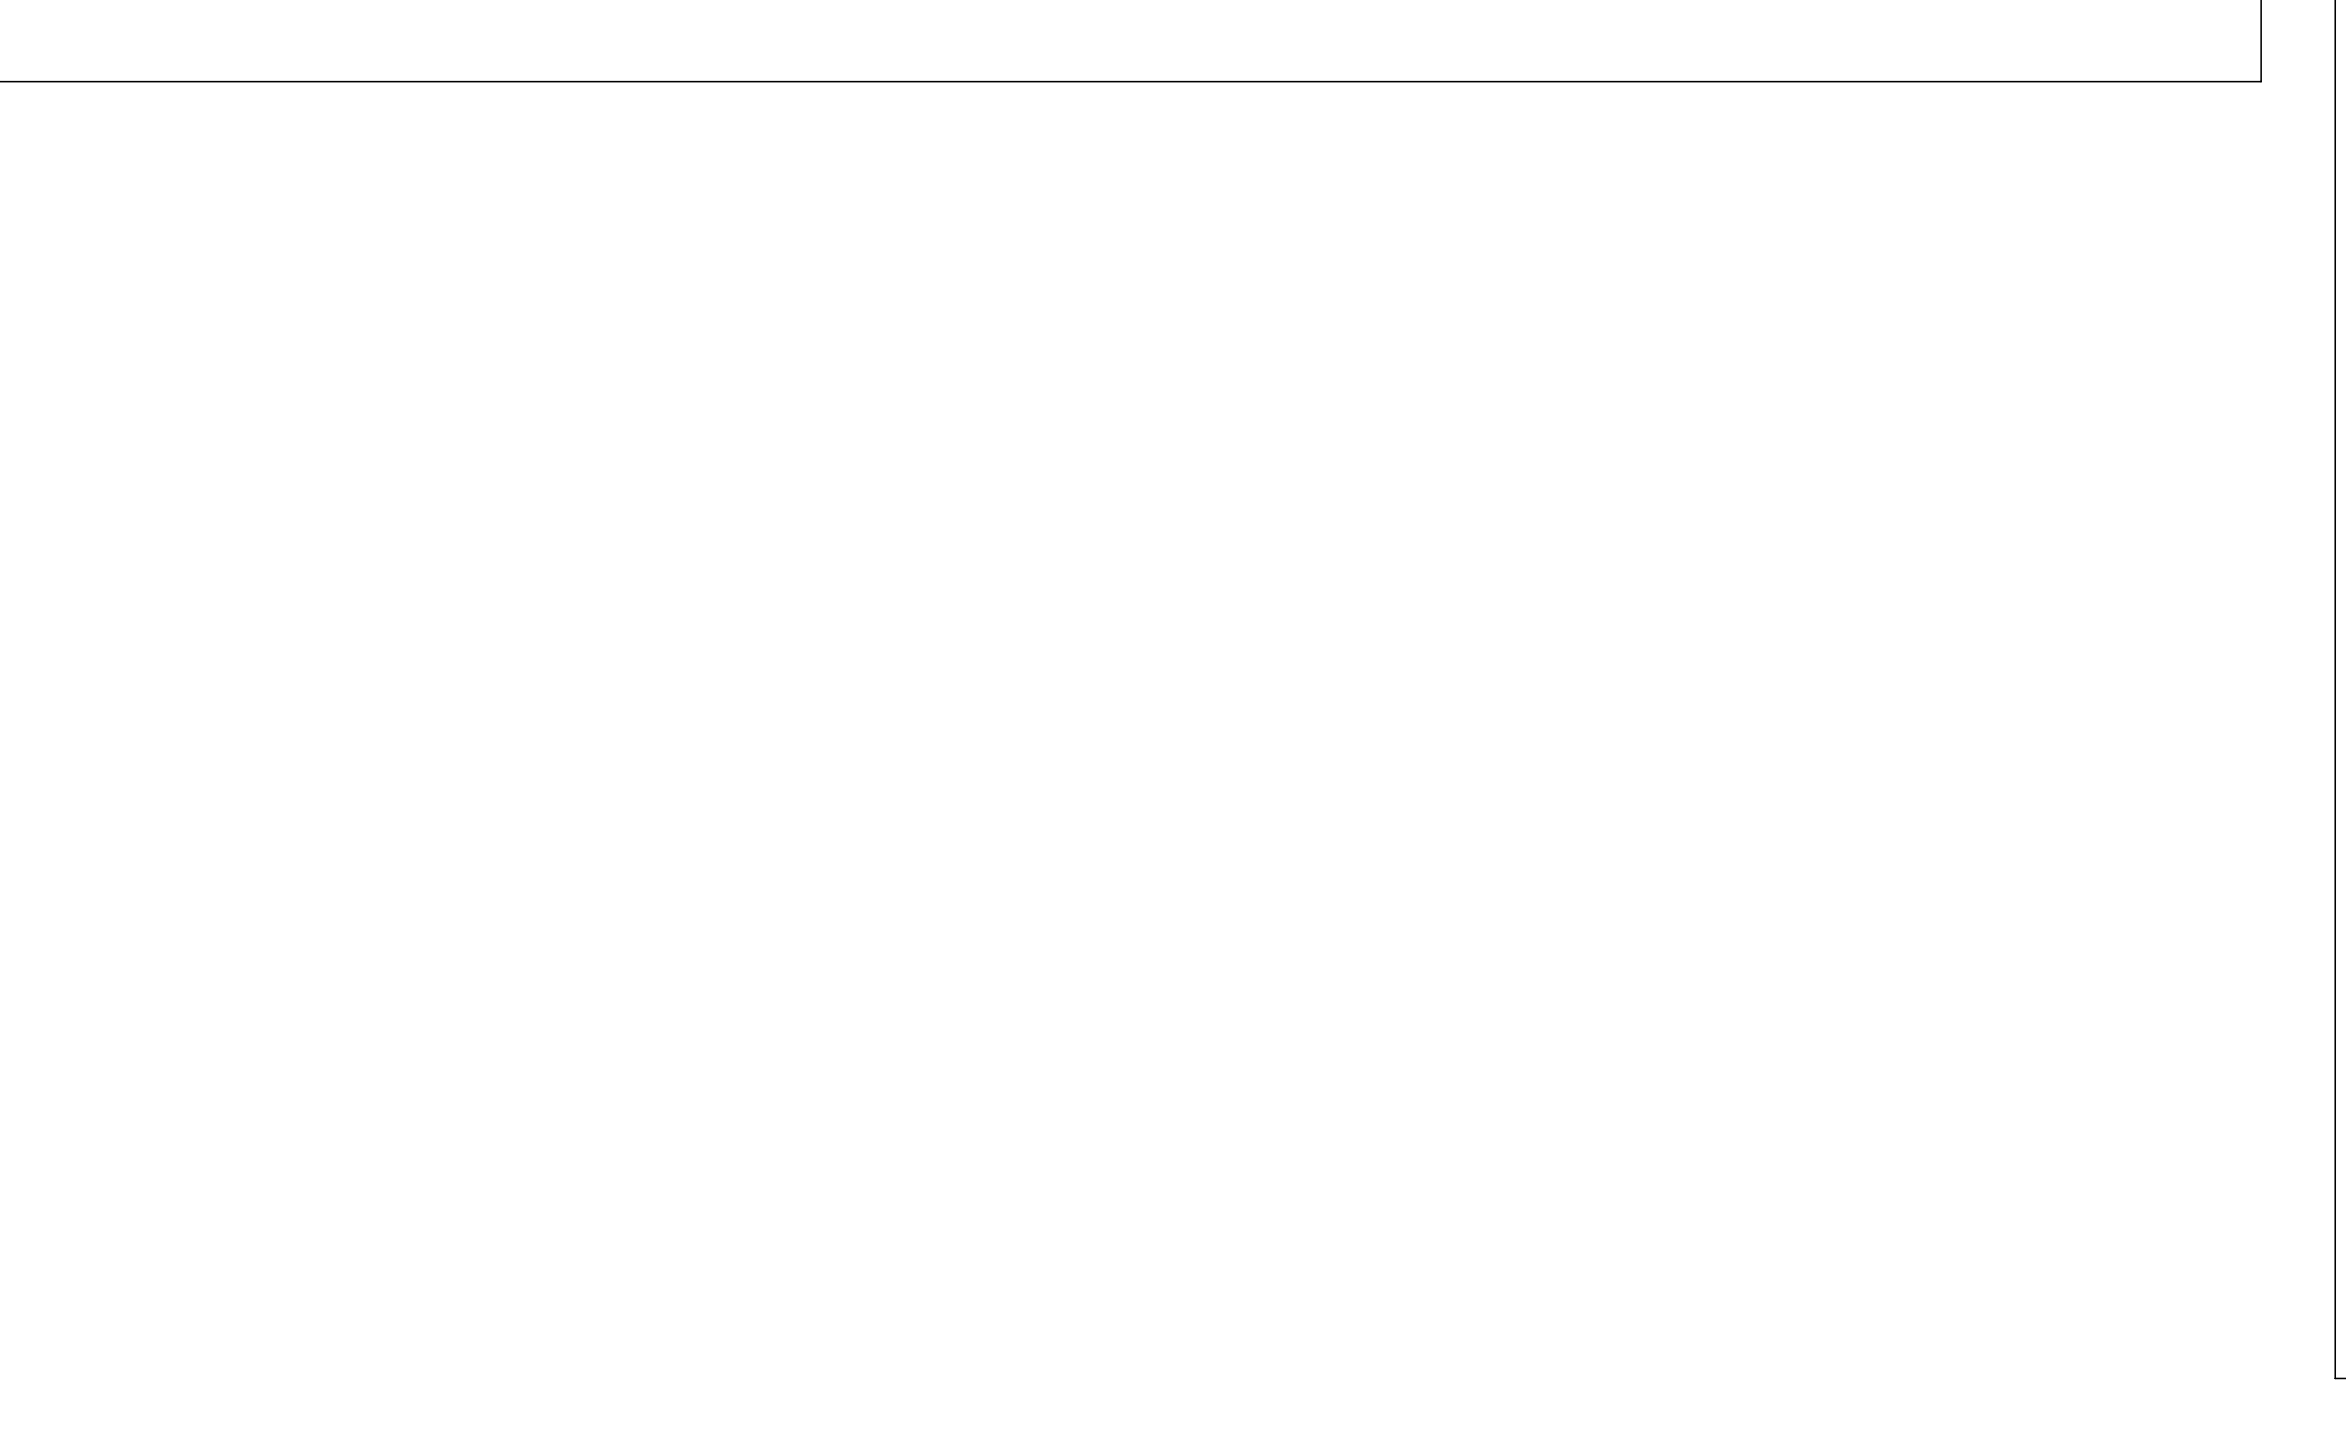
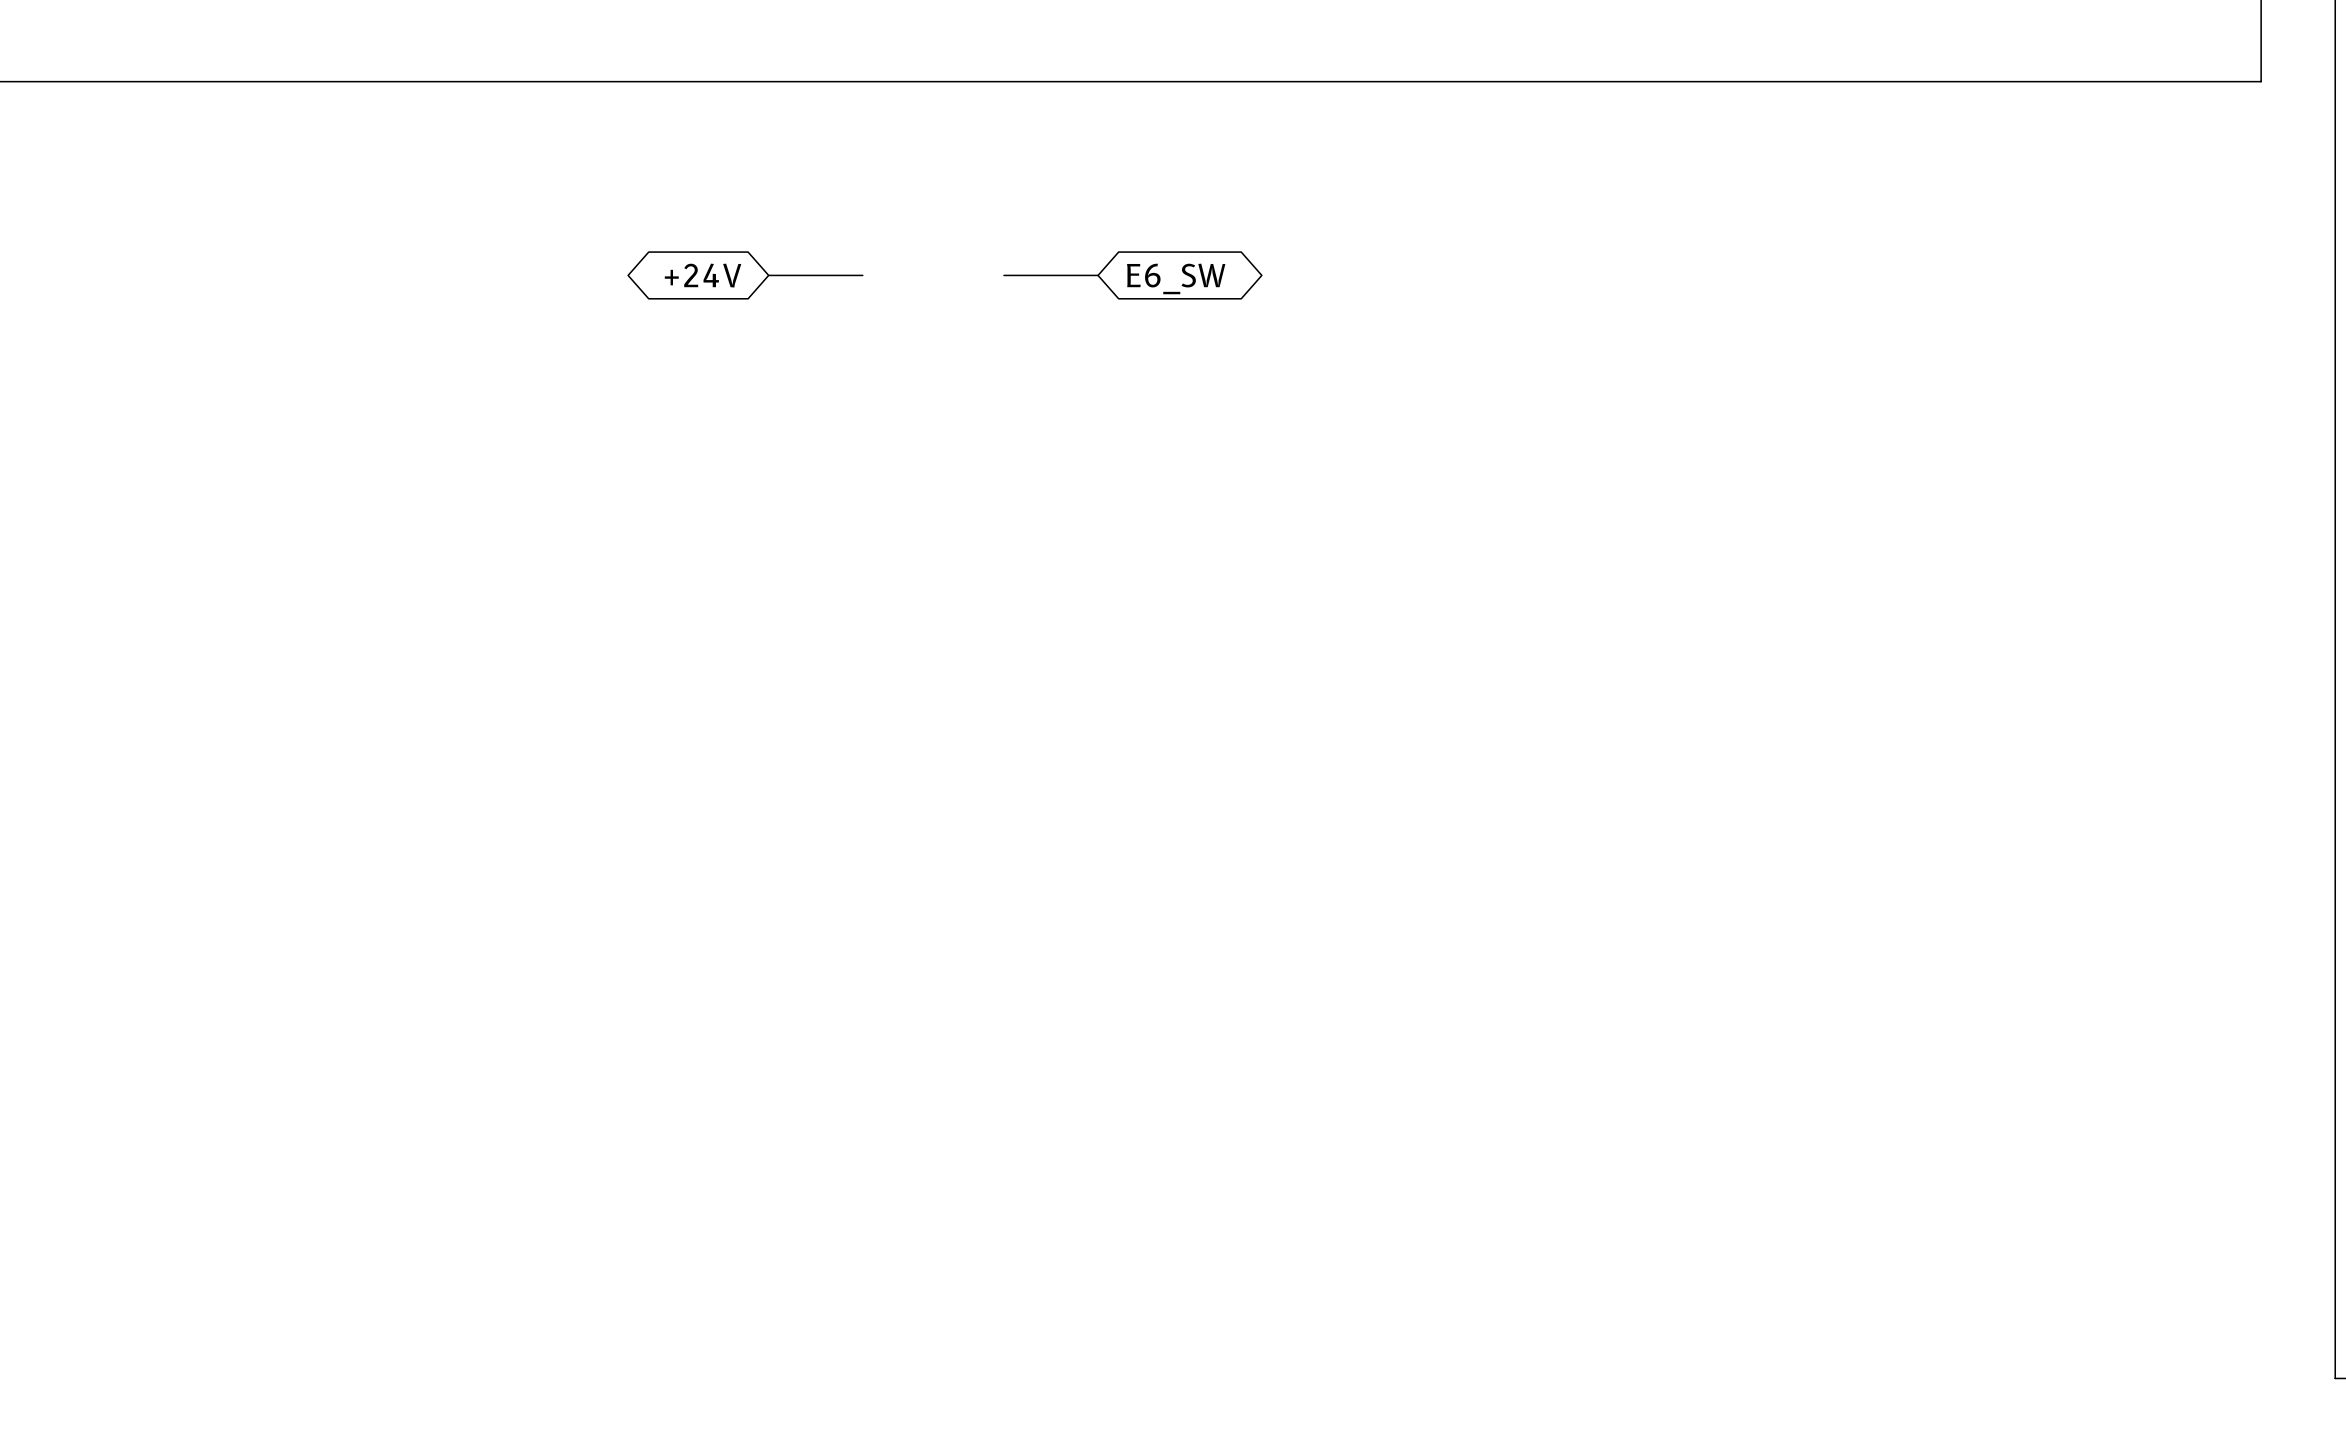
global label: none -> +24V (703, 275)
wire: none -> (768, 275) (862, 275)
wire: none -> (1003, 275) (1098, 275)
global label: none -> E6_SW (1176, 278)

